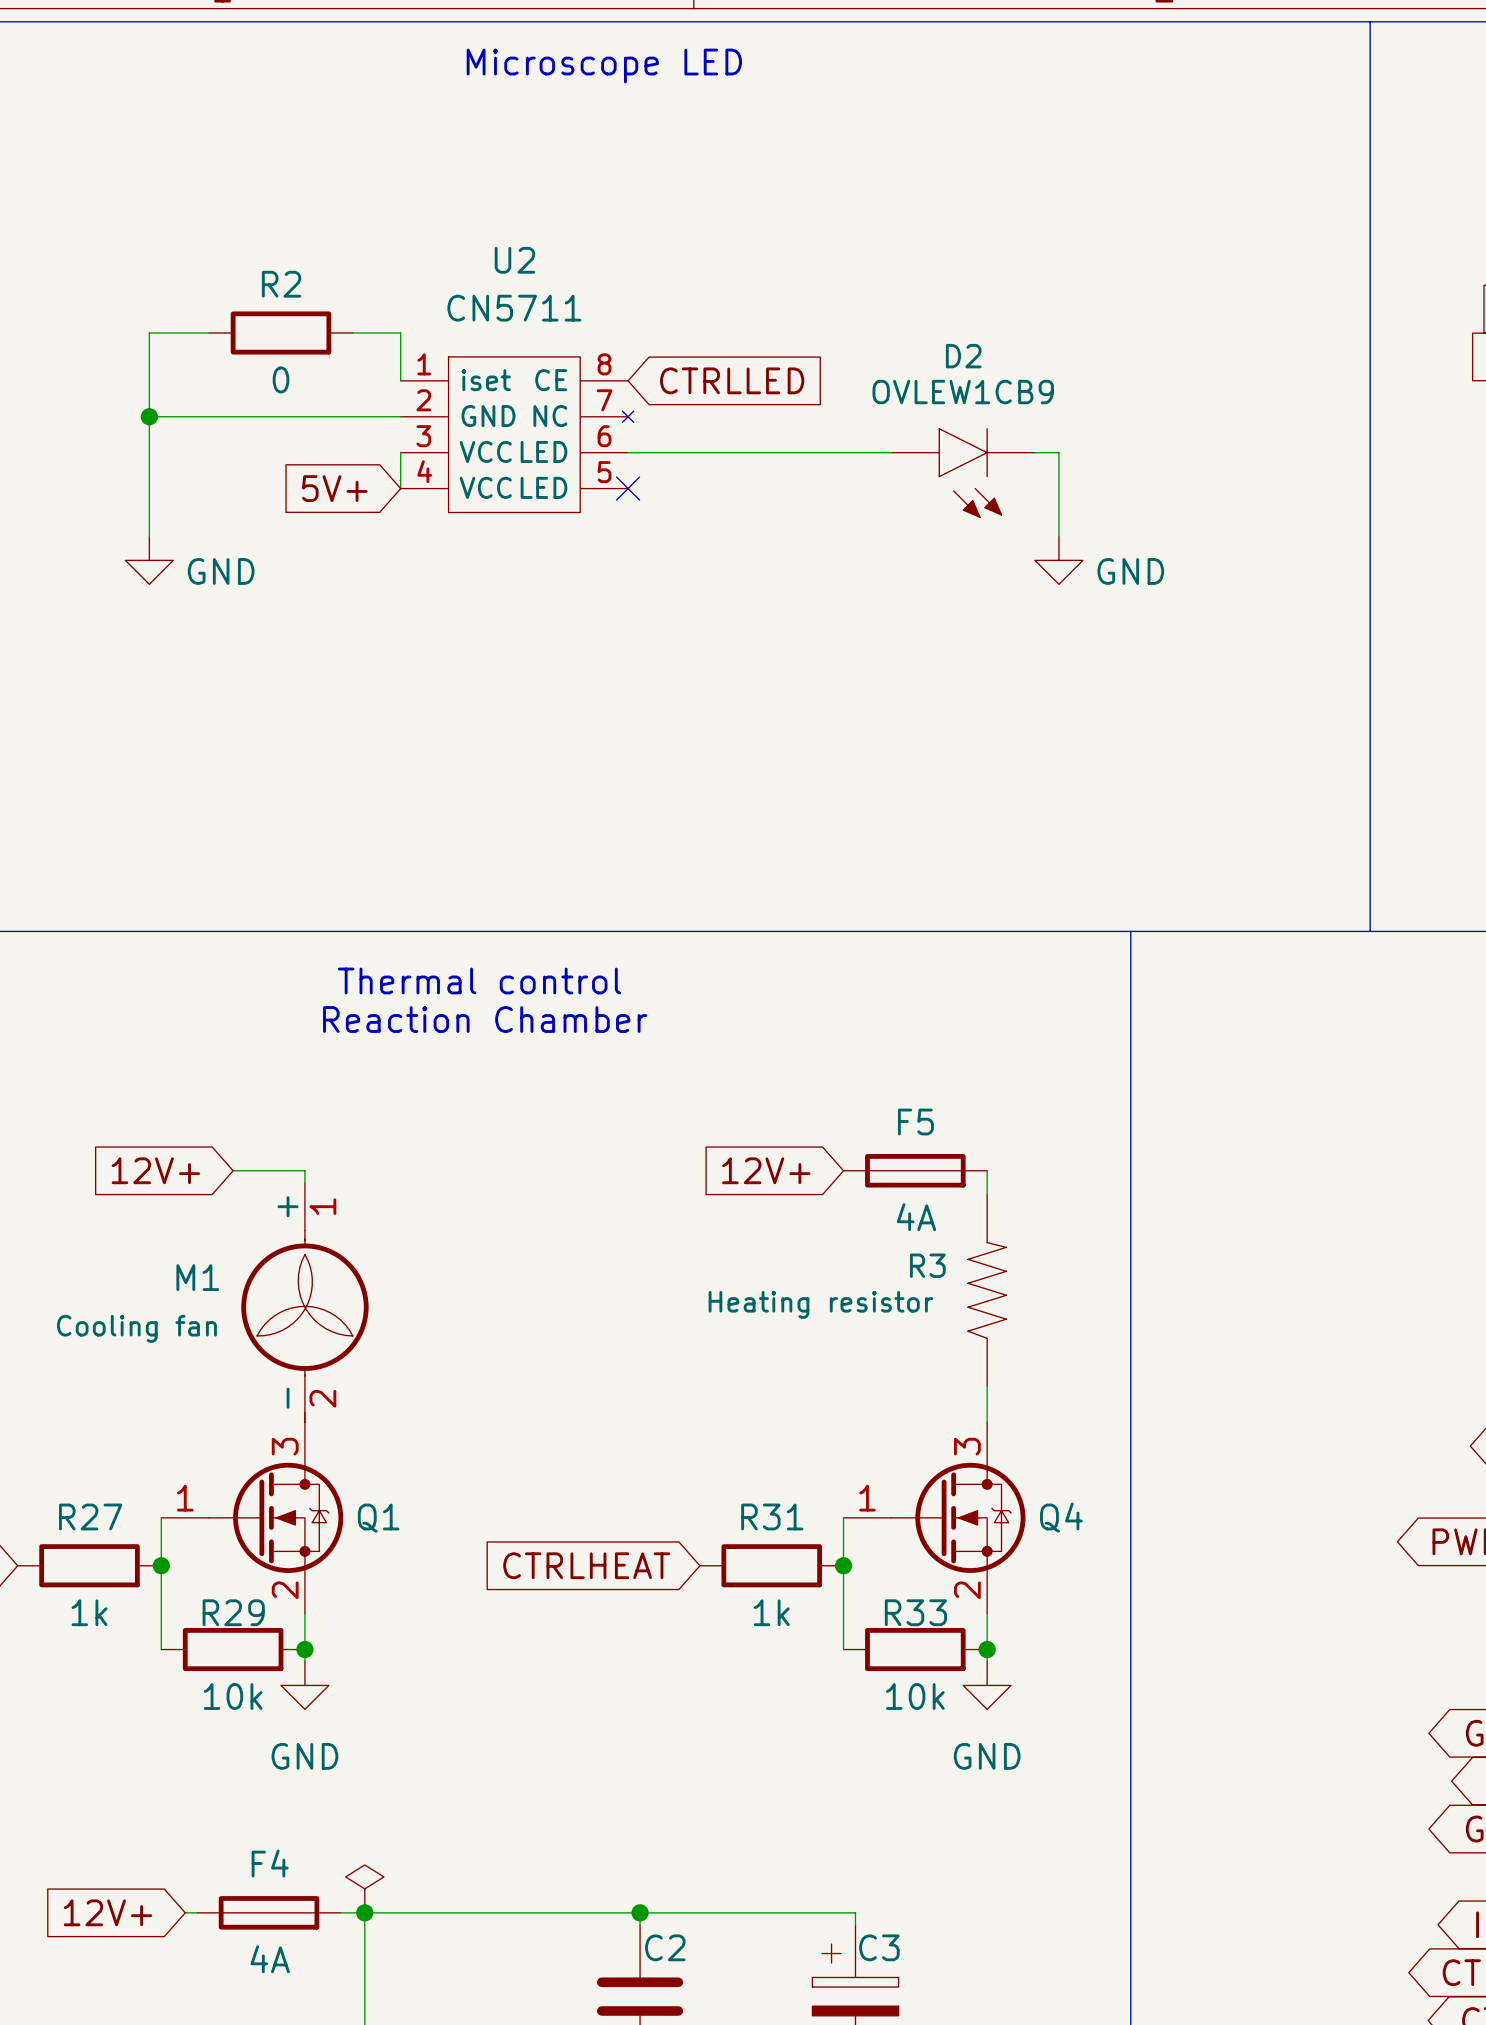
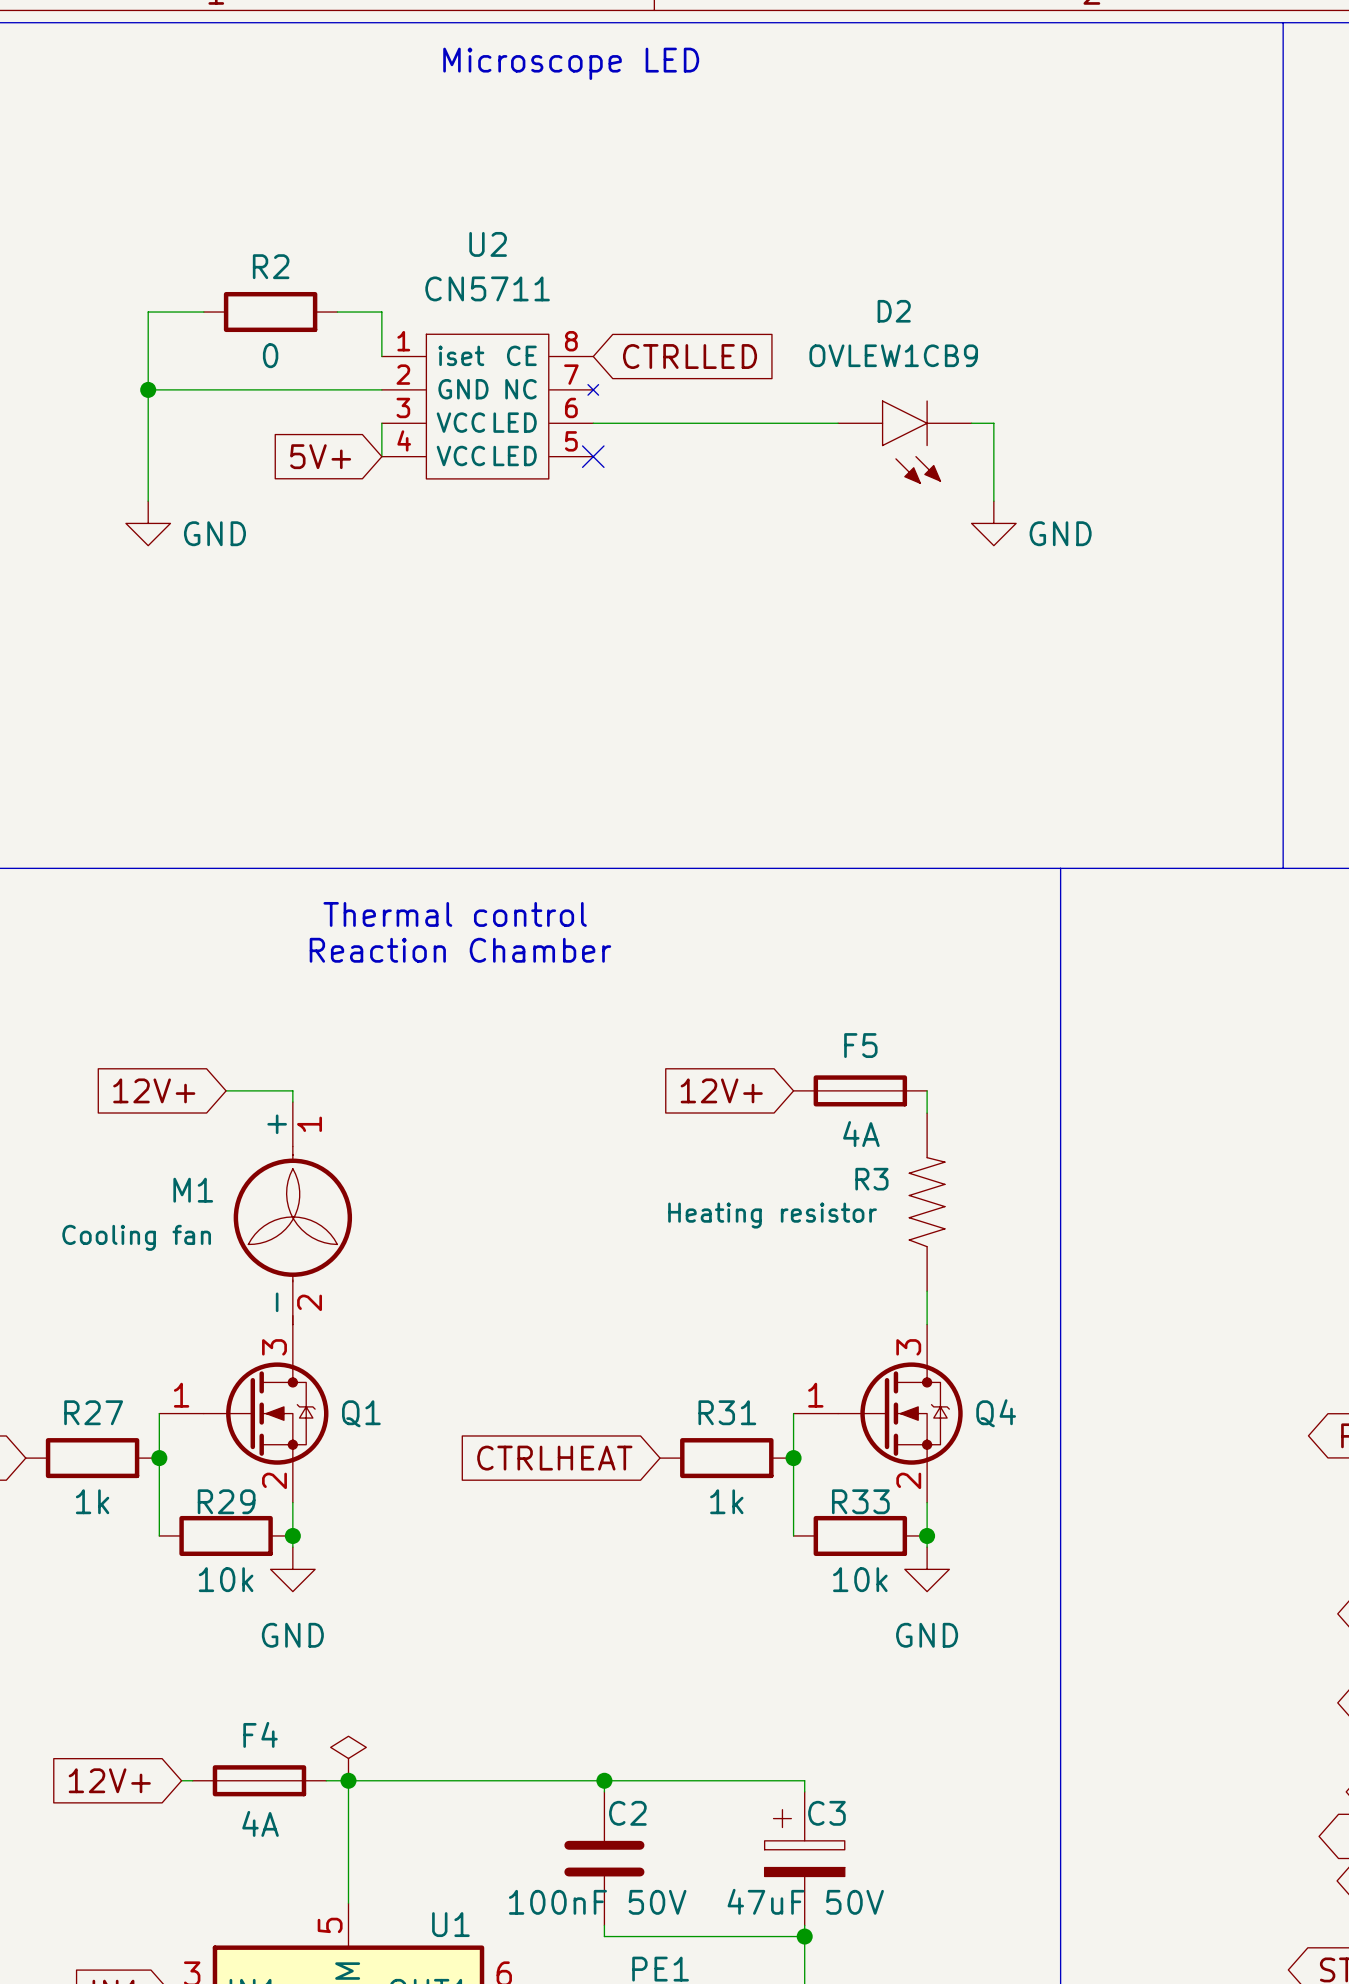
D2 name position: D2 (963, 356) -> D2 (894, 311)
D2 value position: OVLEW1CB9 (963, 392) -> OVLEW1CB9 (893, 355)

